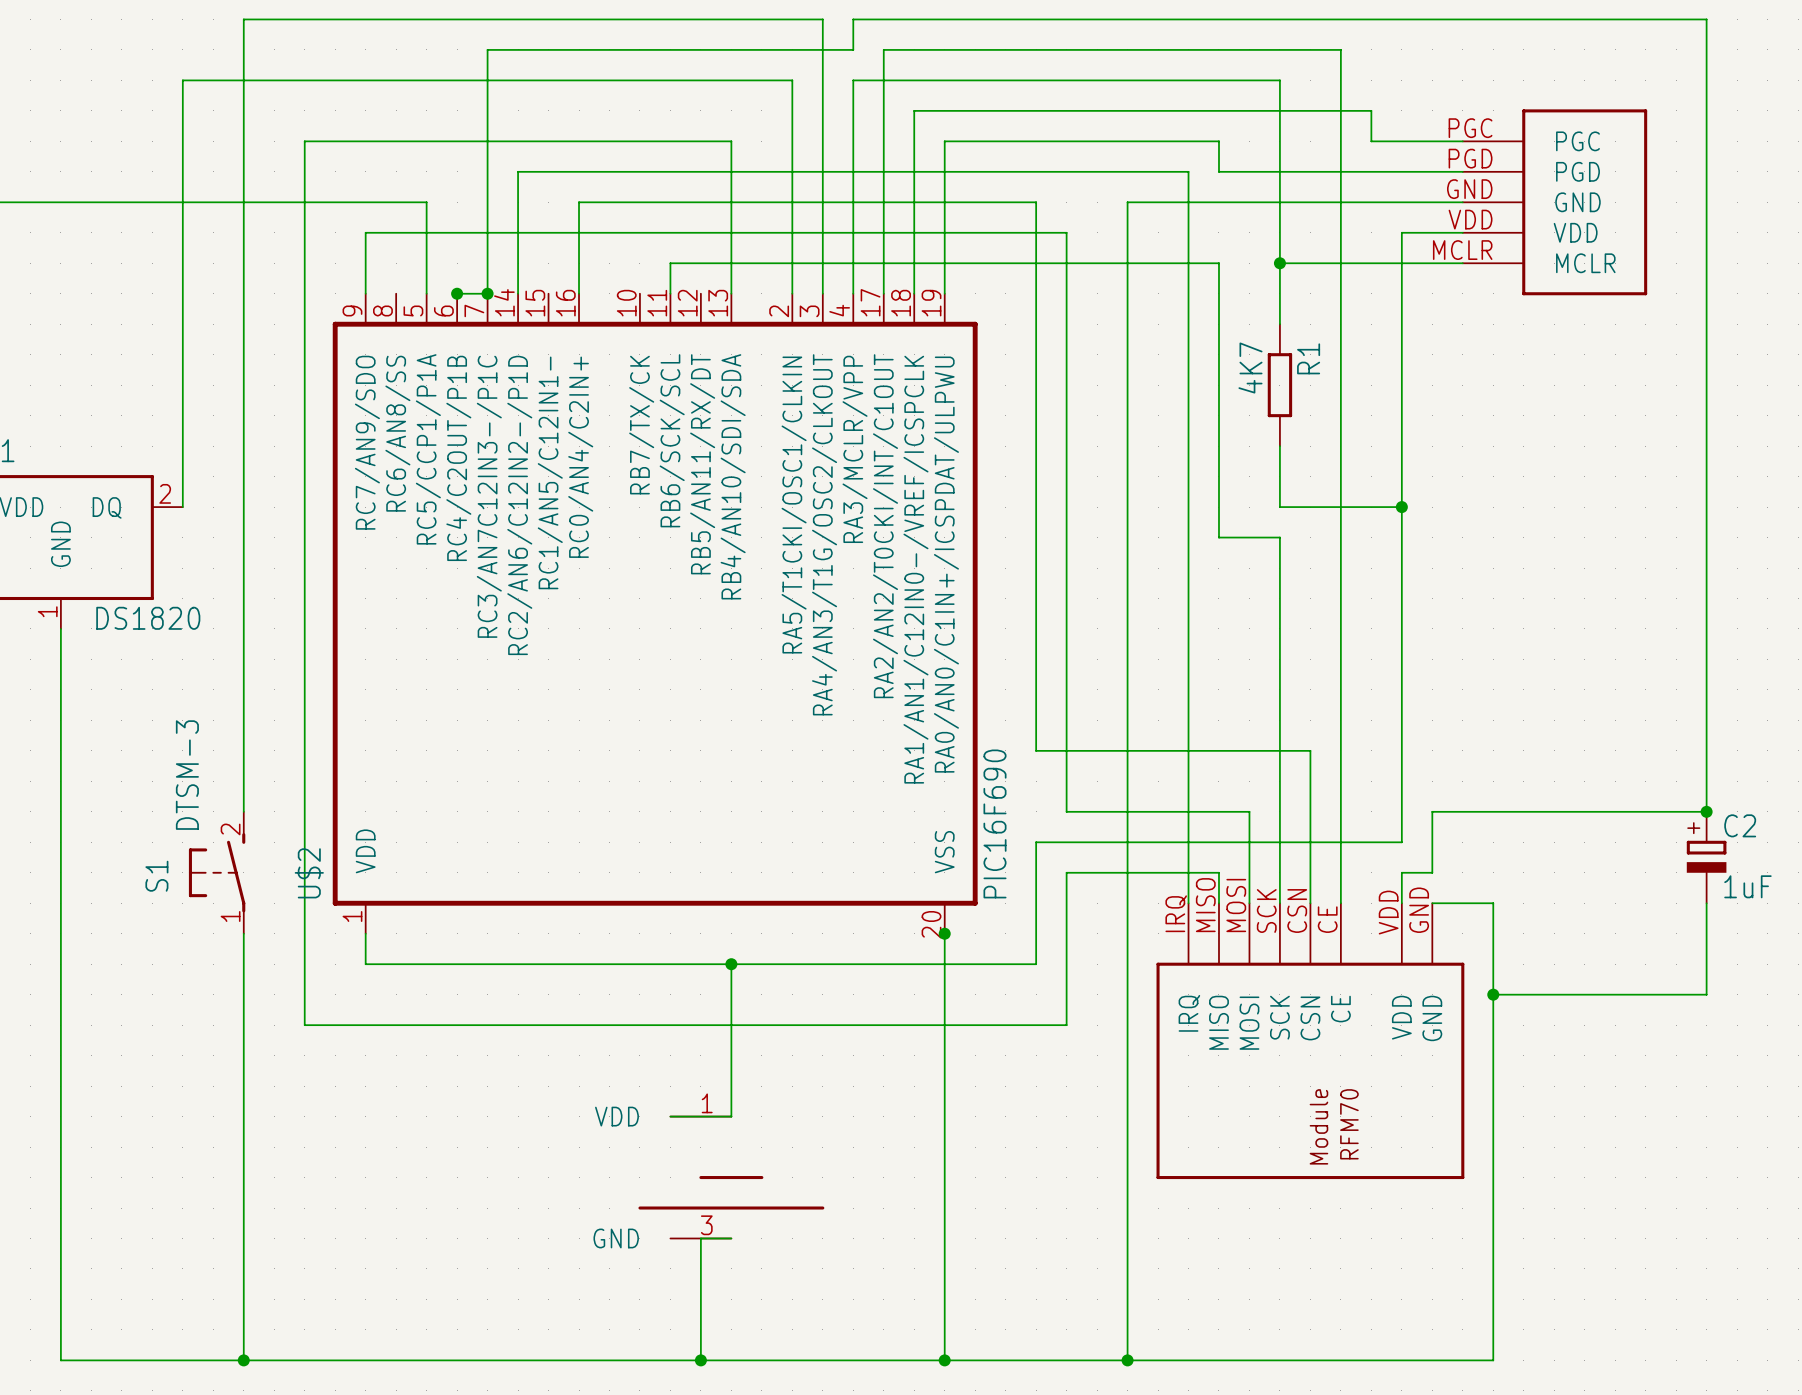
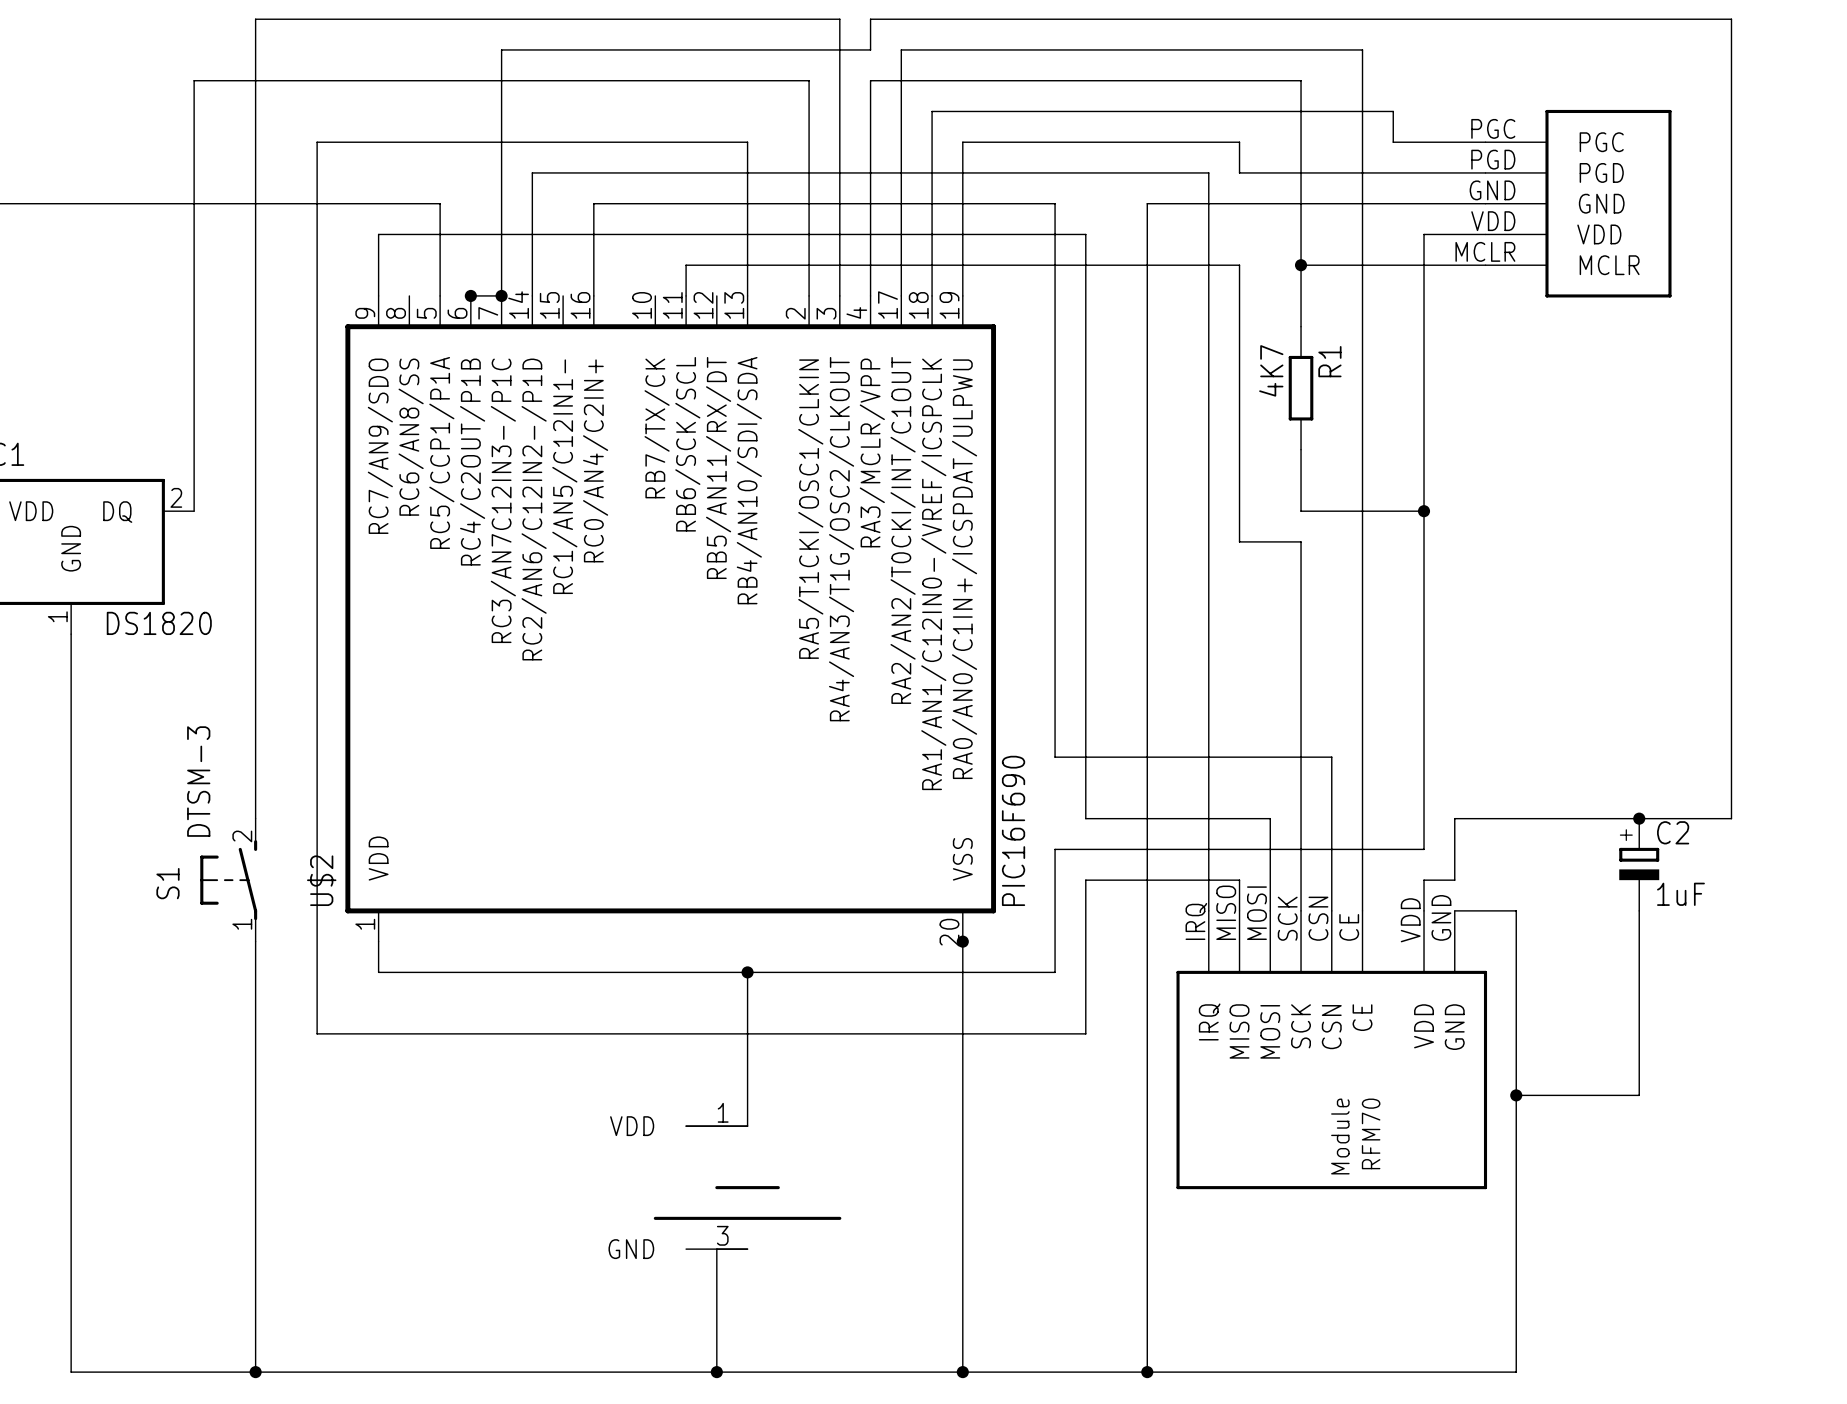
junction: none -> (1639, 818)
junction: (1706, 811) -> none
C2 position: (1706, 857) -> (1639, 864)
wire: none -> (1639, 910) (1639, 1095) (1516, 1095)
wire: (1706, 903) (1706, 994) (1493, 994) -> none
junction: (1493, 994) -> none
junction: none -> (1516, 1095)

